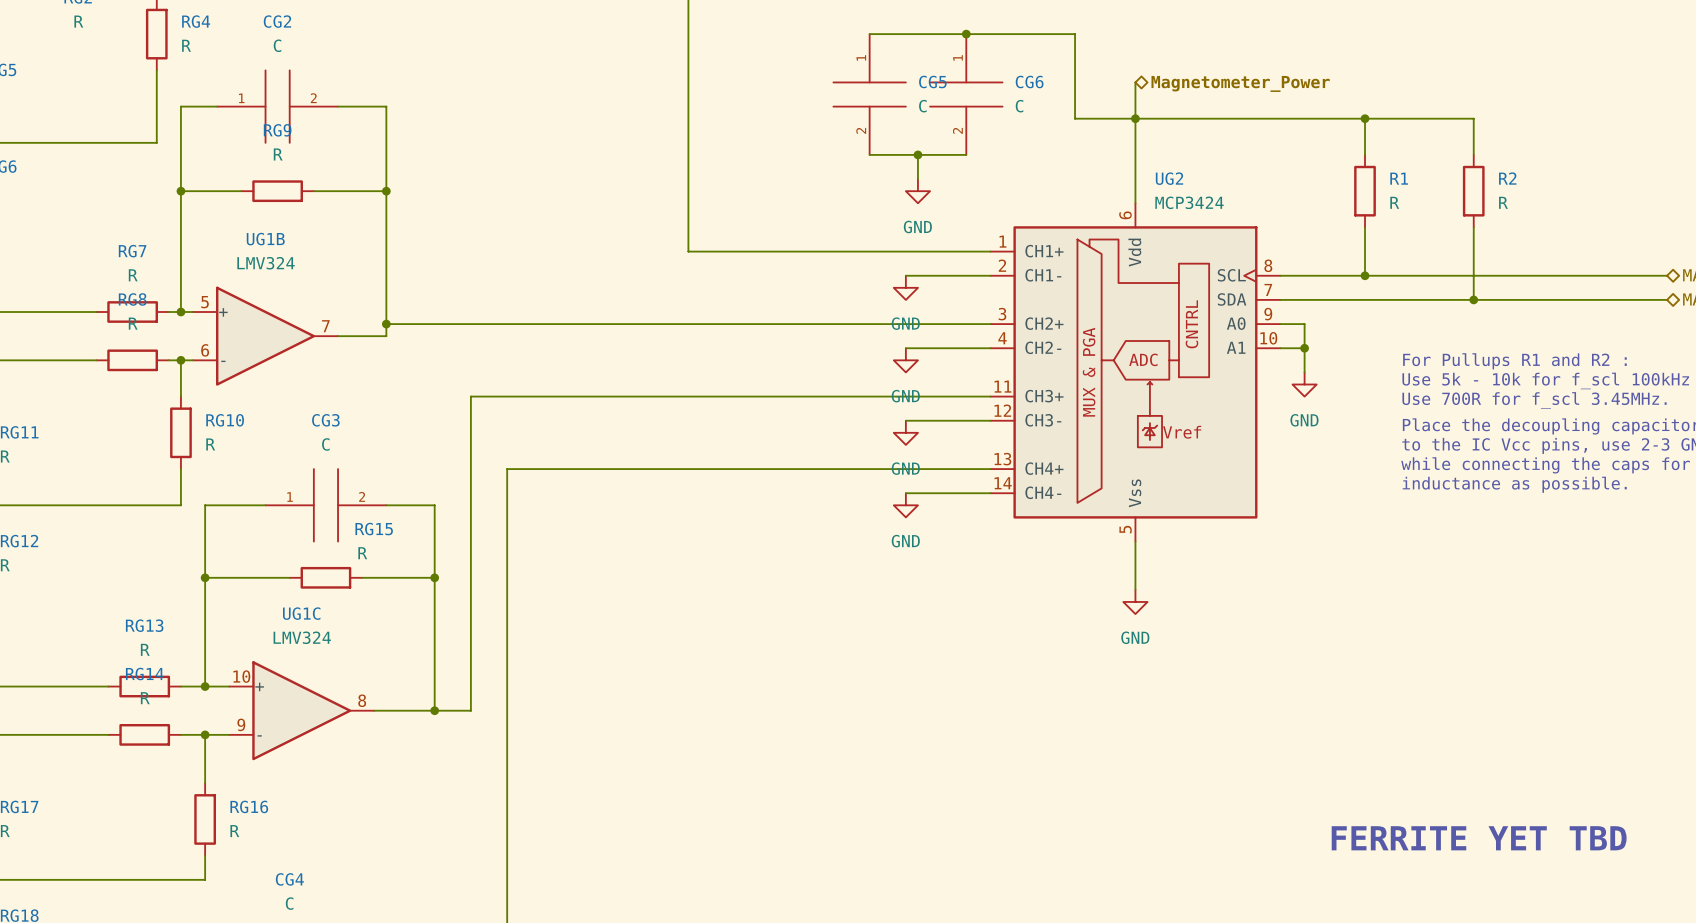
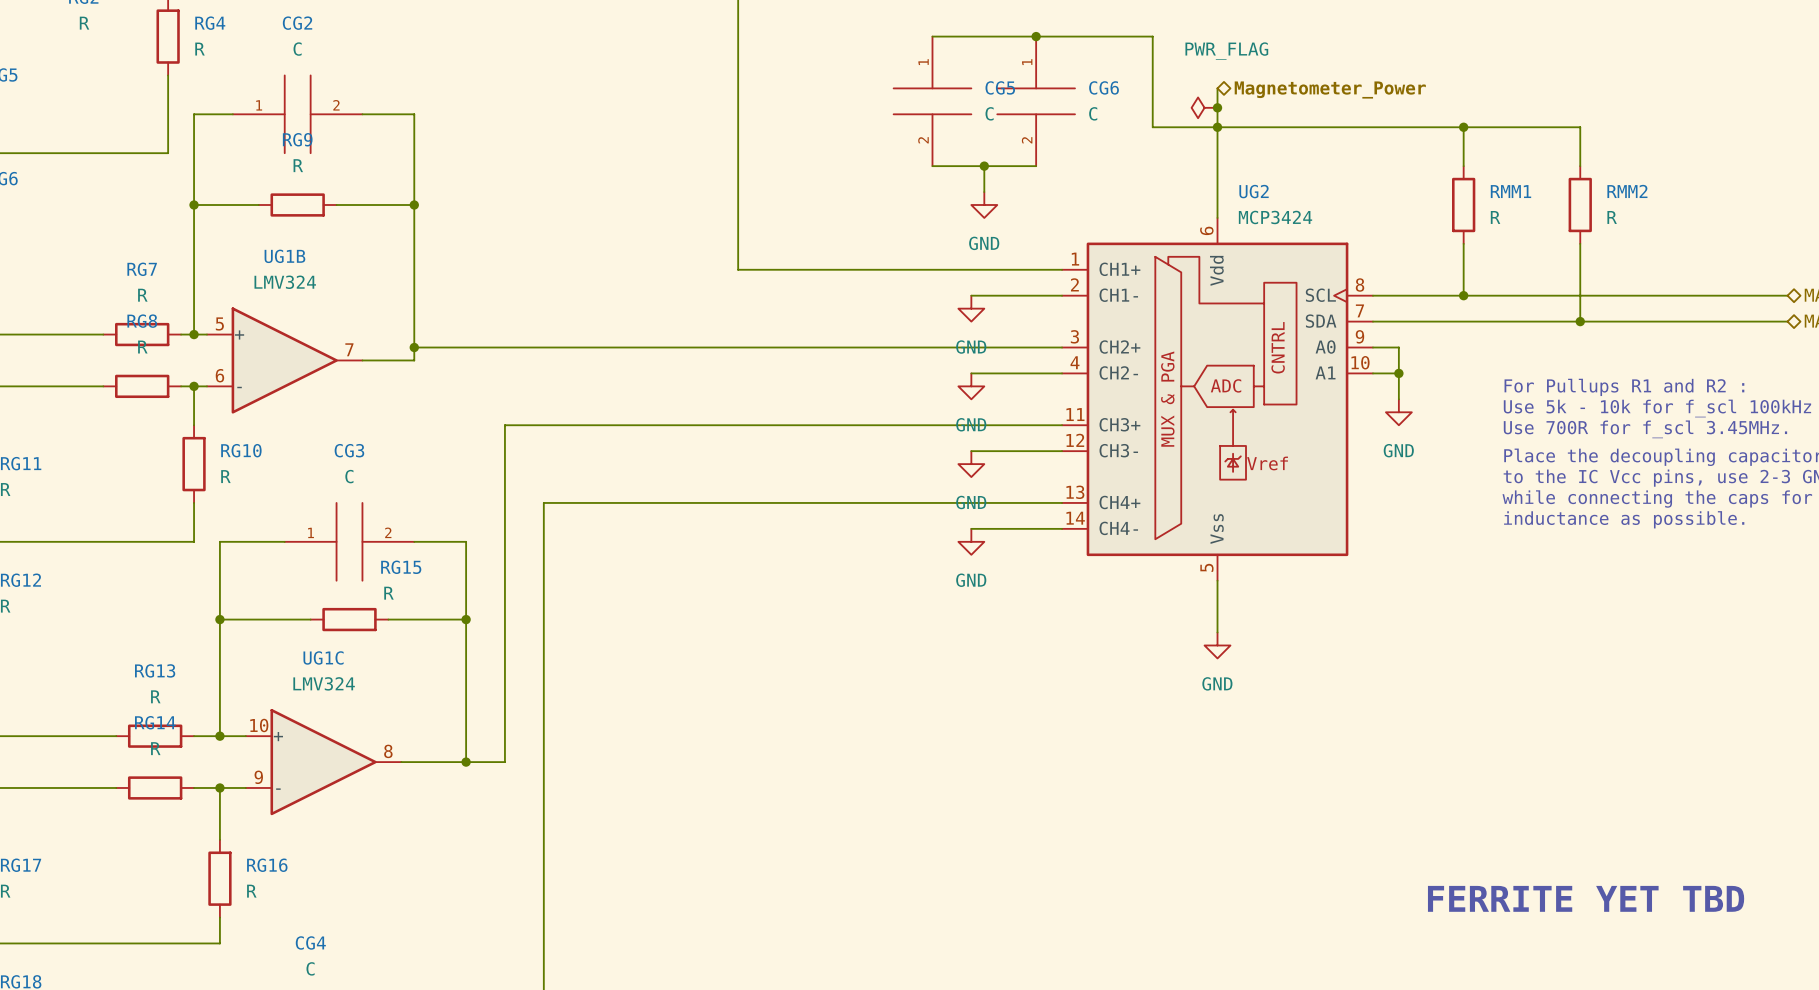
power symbol: none -> PWR_FLAG (1204, 107)
junction: none -> (1217, 107)
R1 name: R1 (1399, 178) -> RMM1 (1510, 191)
R2 name: R2 (1507, 178) -> RMM2 (1627, 191)

